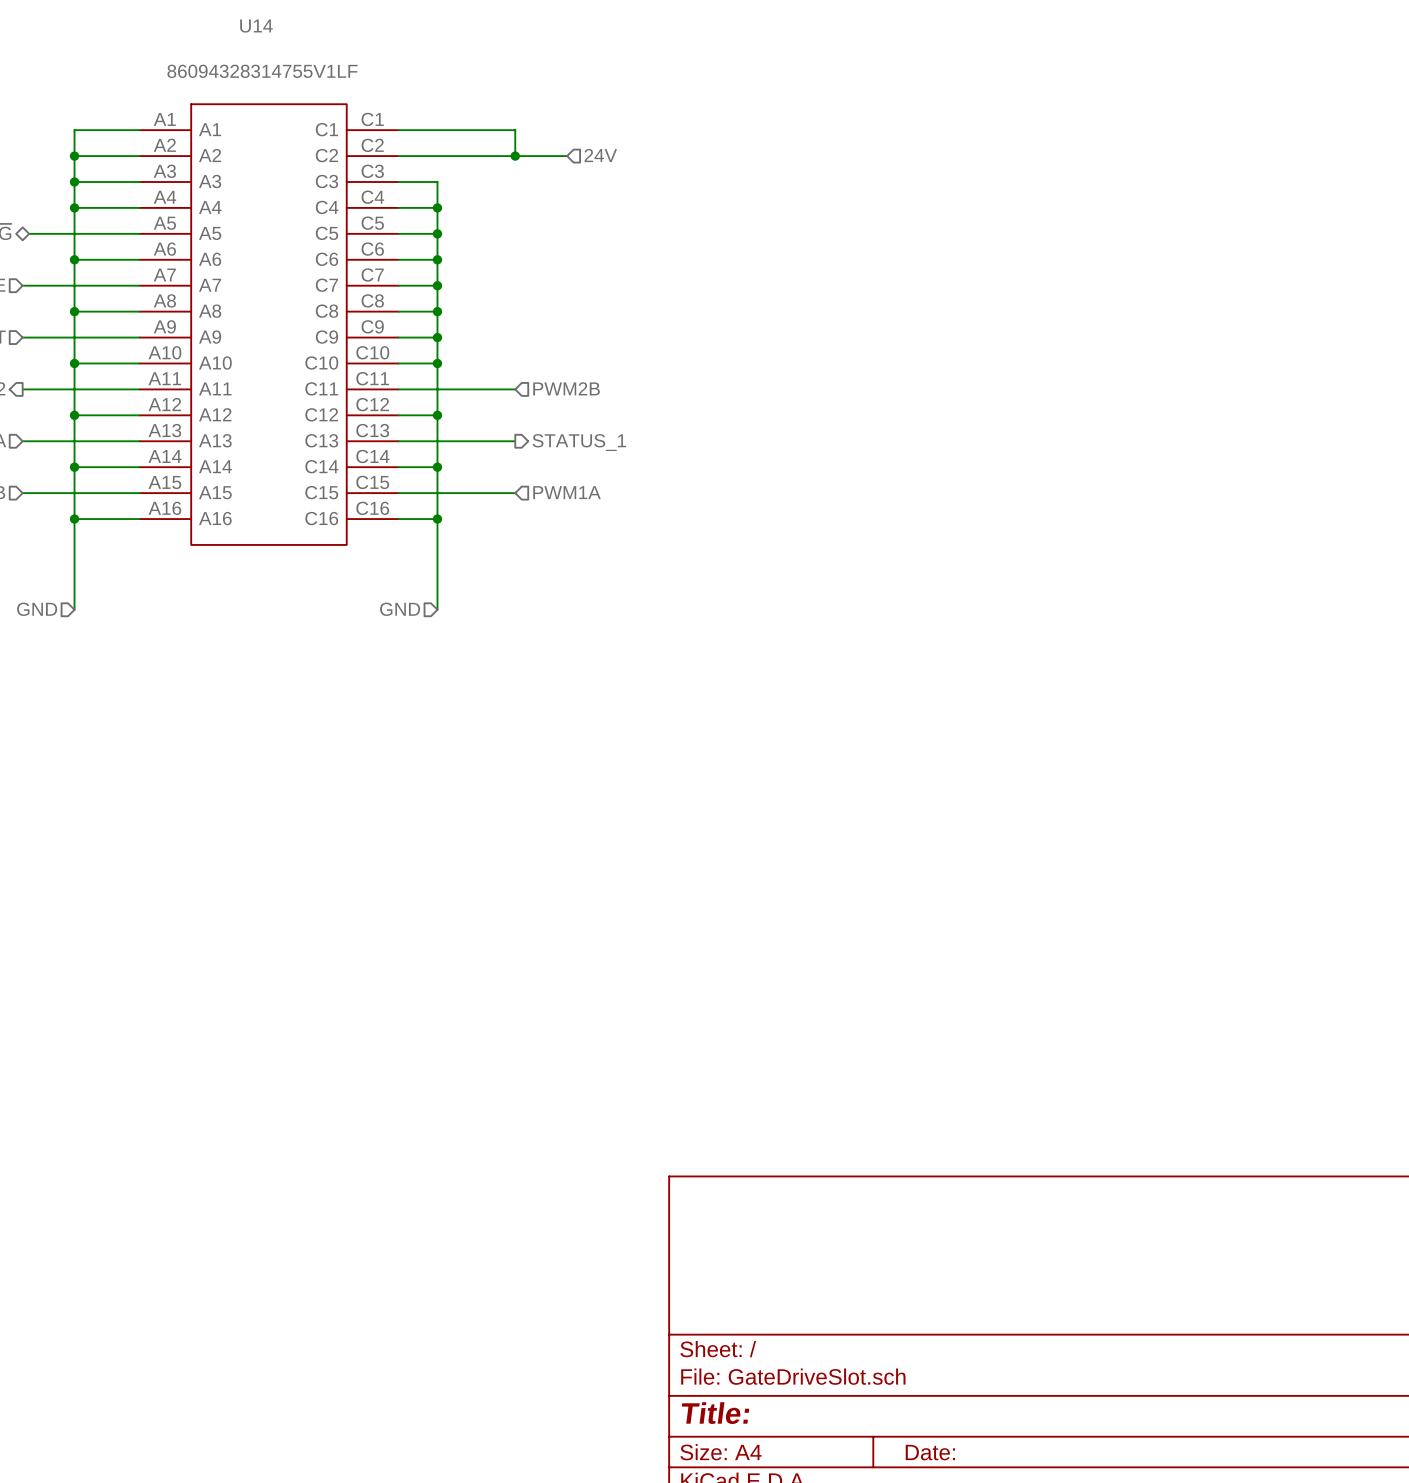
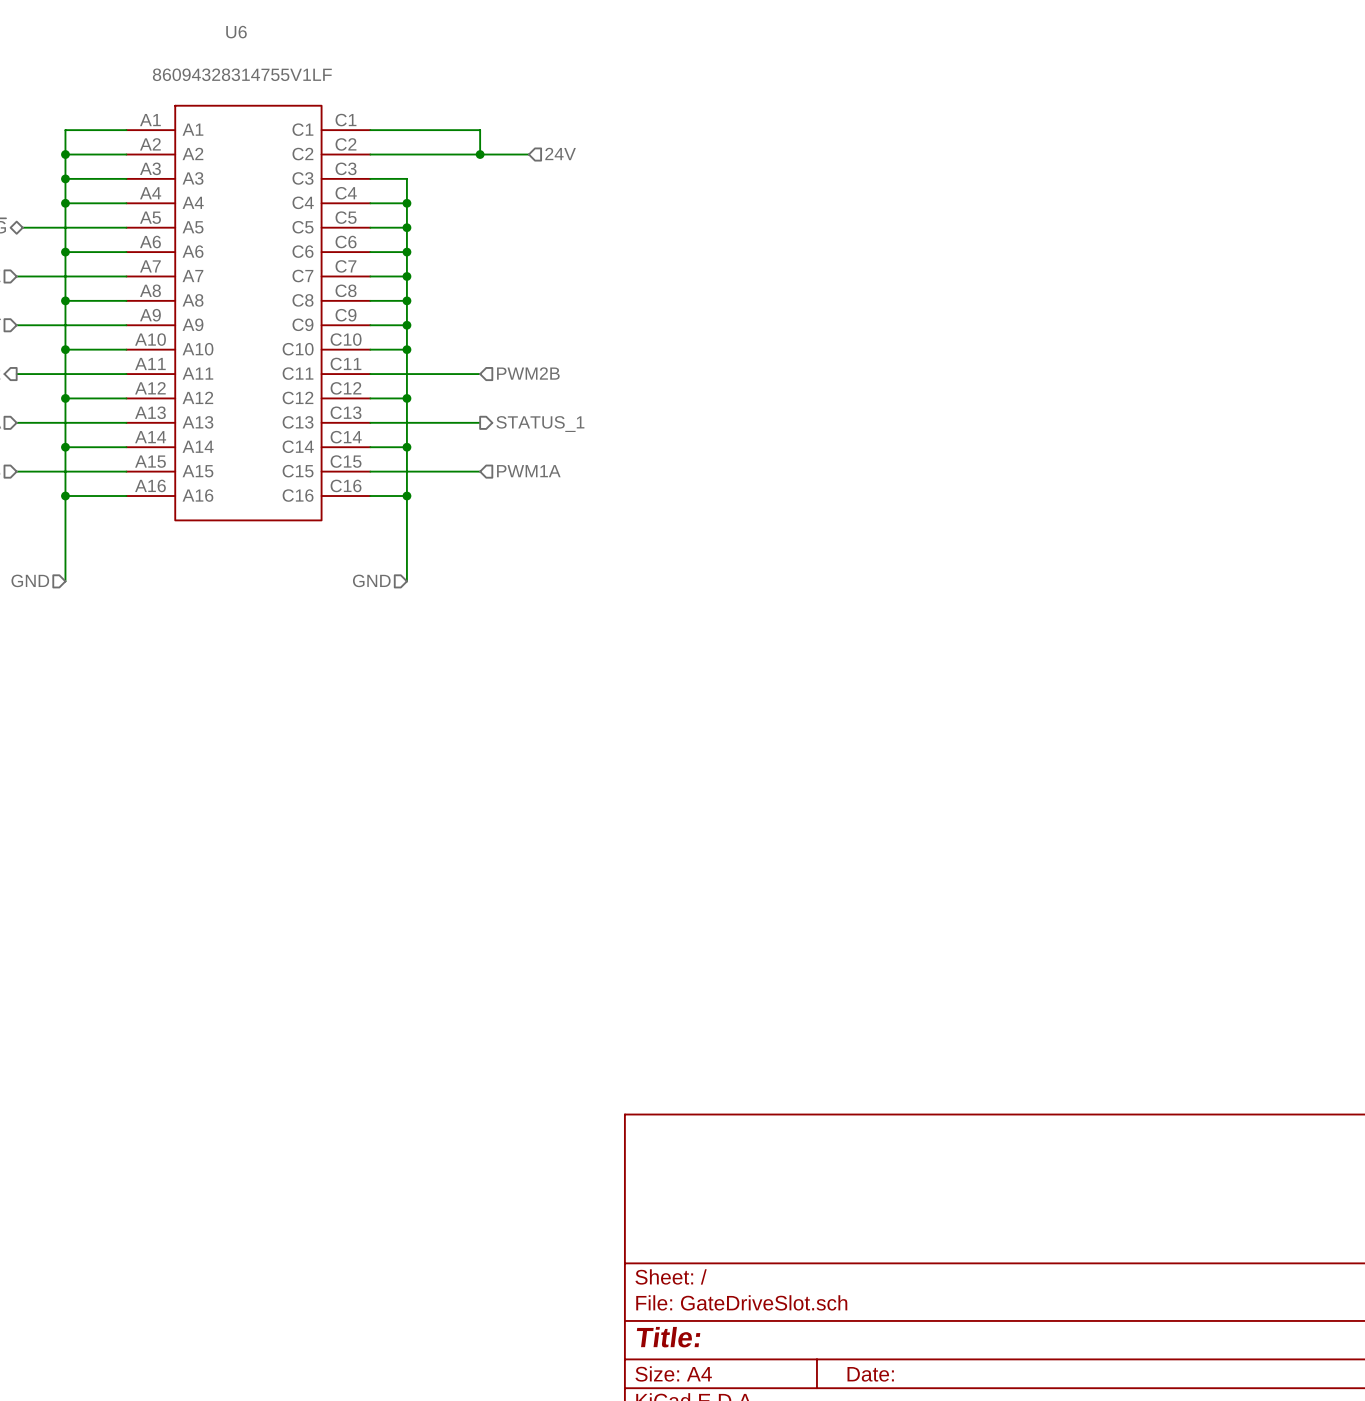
U14 name: U14 (256, 26) -> U6 (236, 32)

